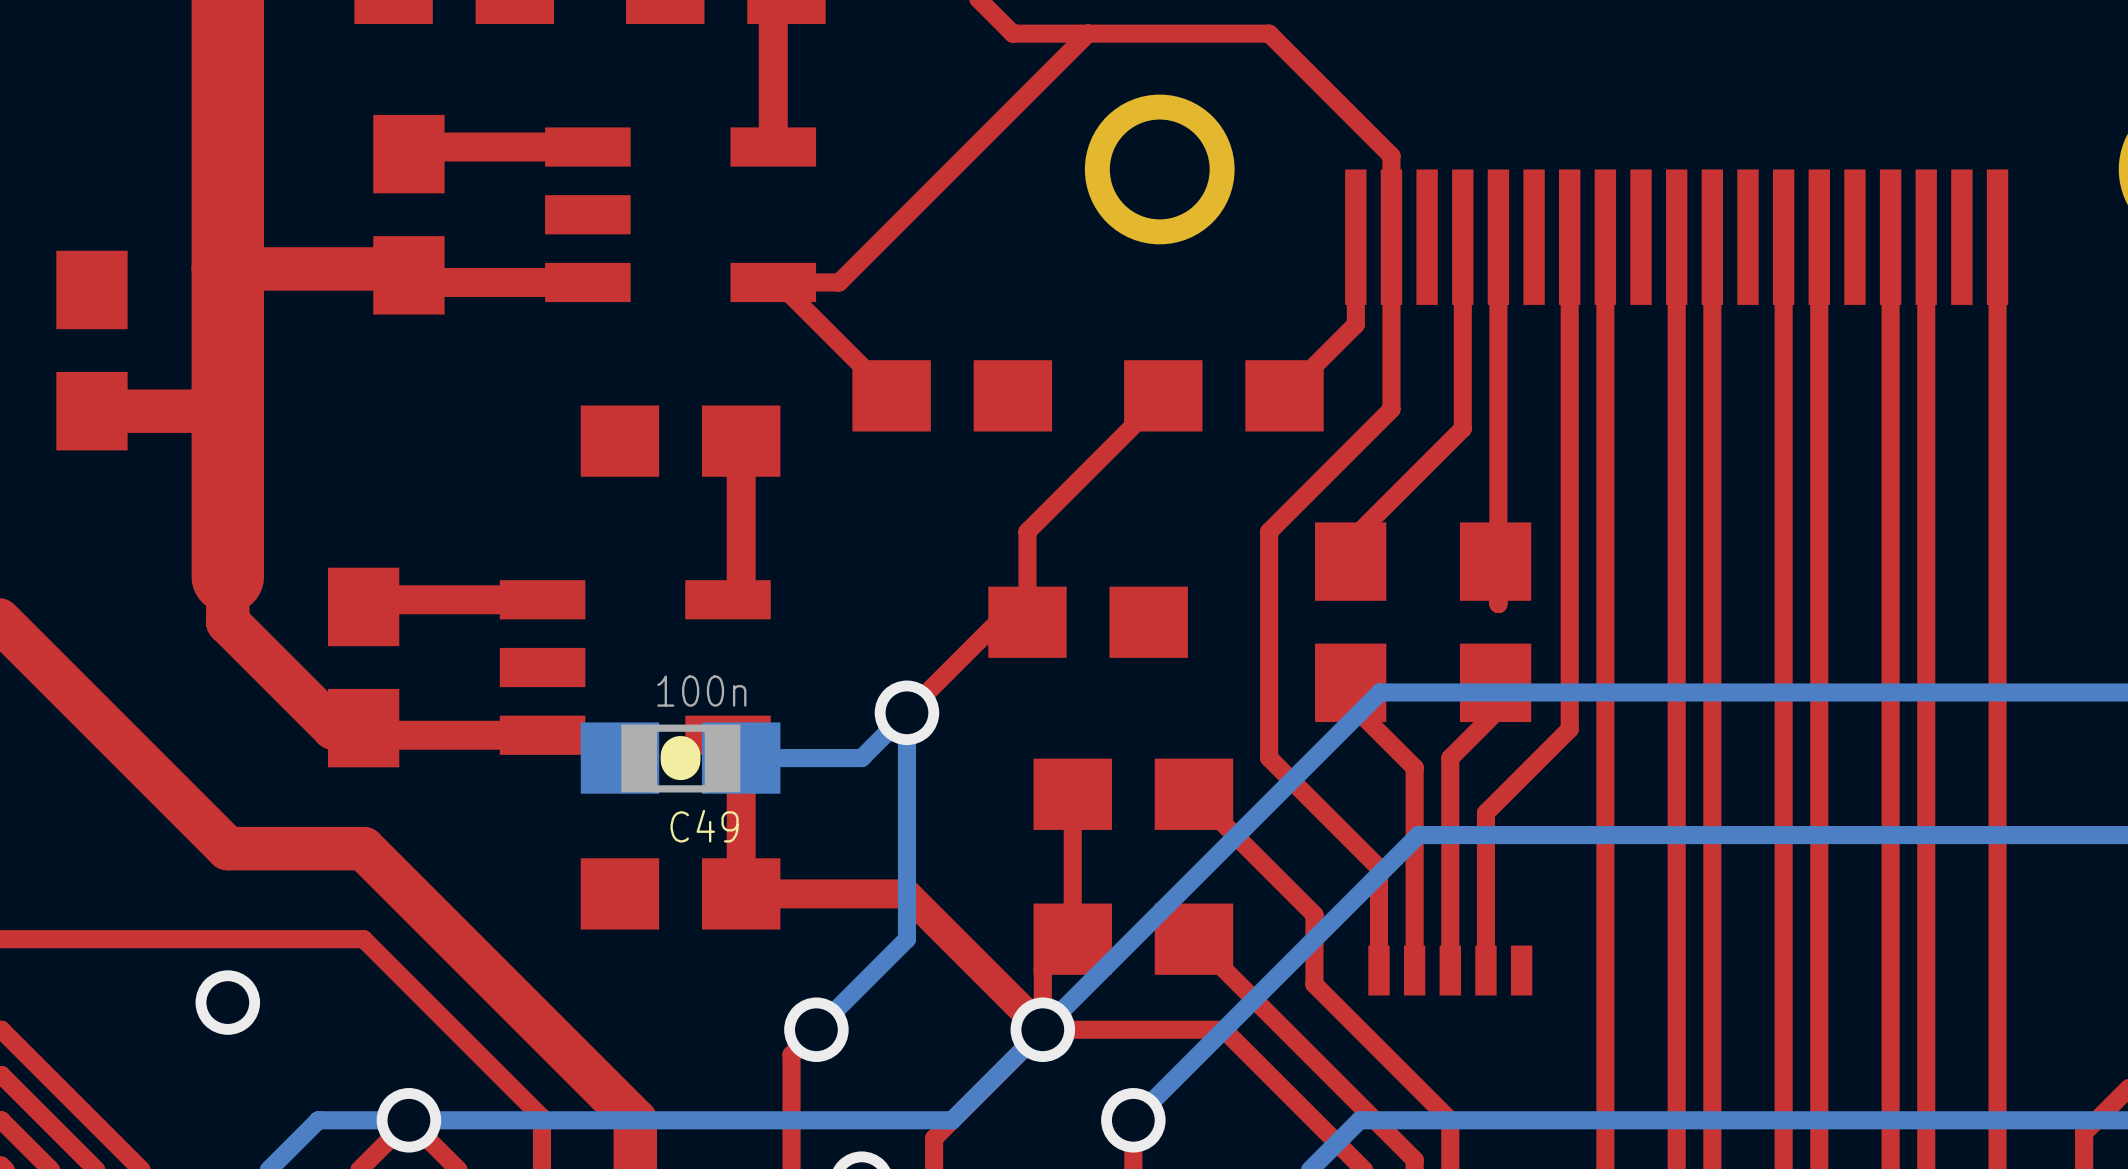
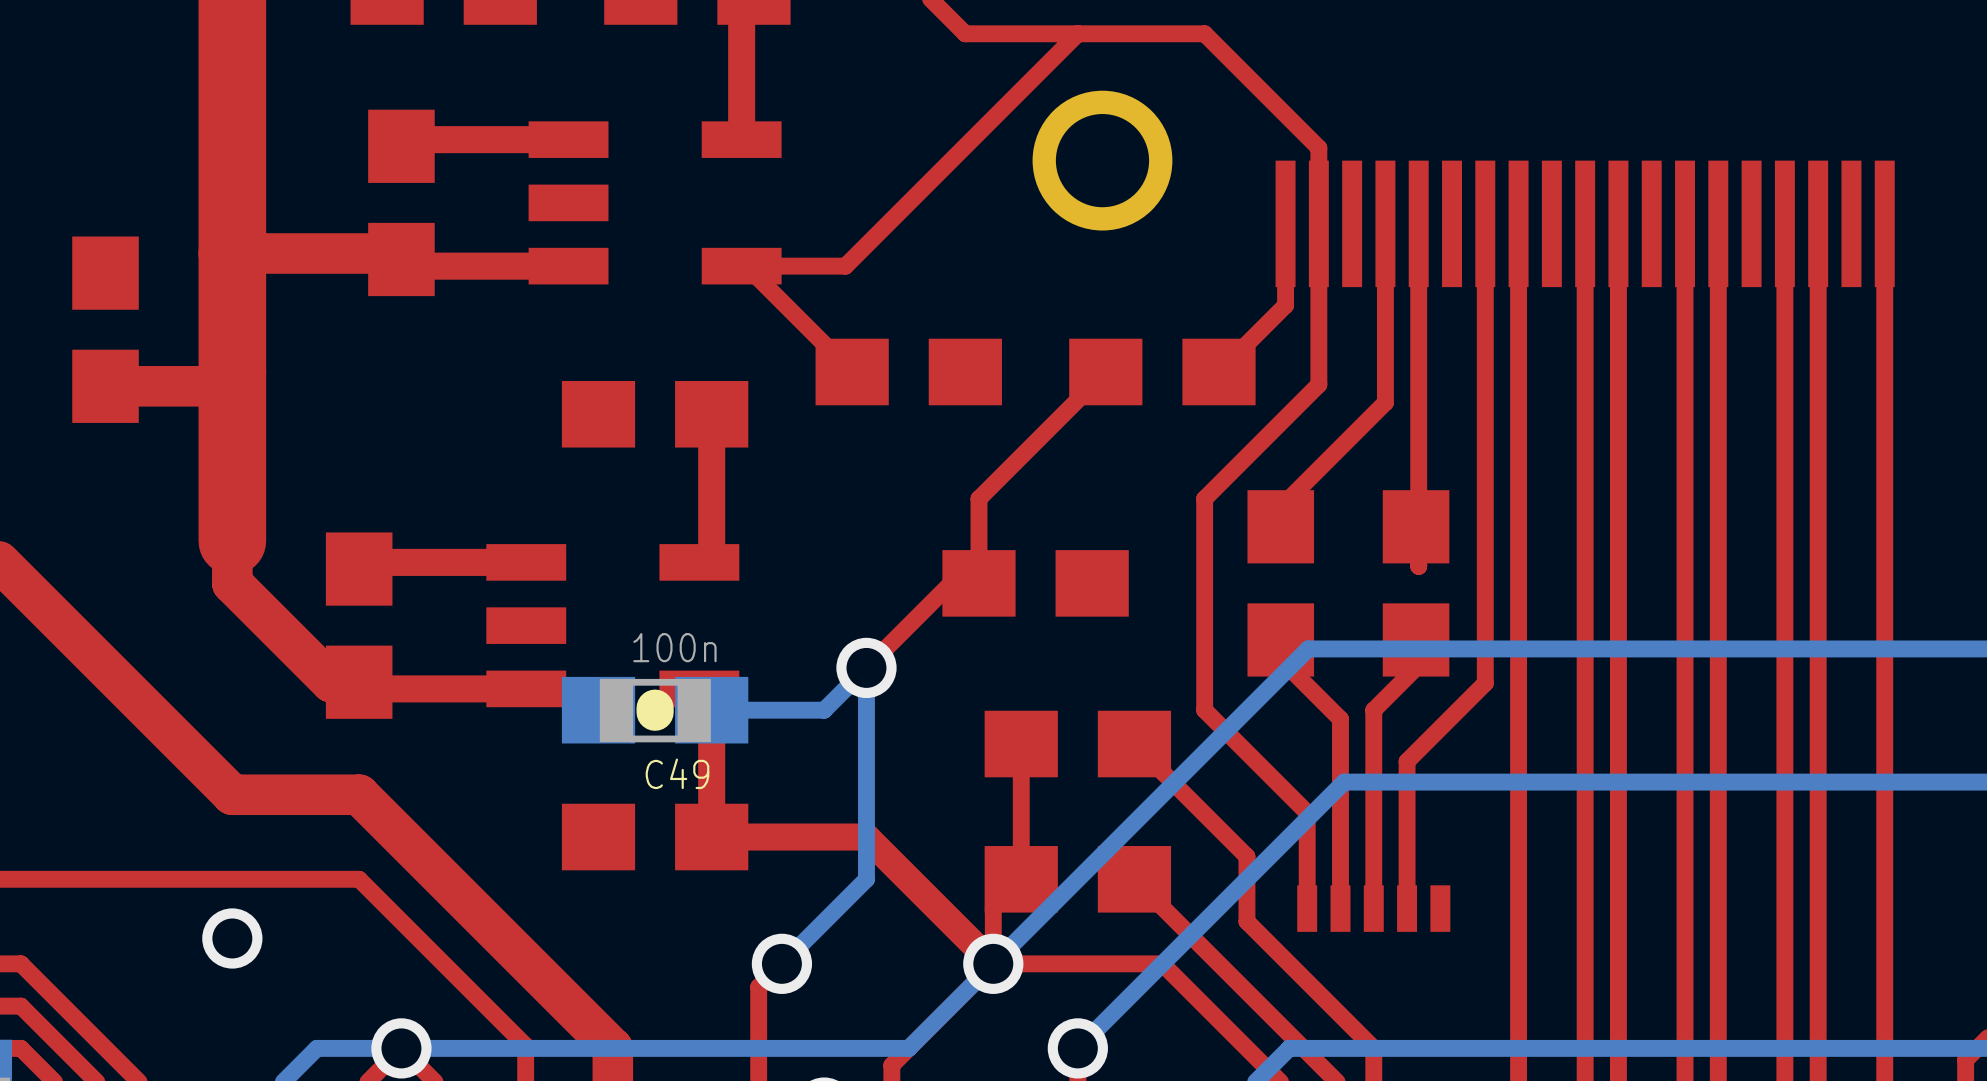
top track: (1088, 33) (839, 282) -> (1077, 33) (845, 266) (803, 266)

